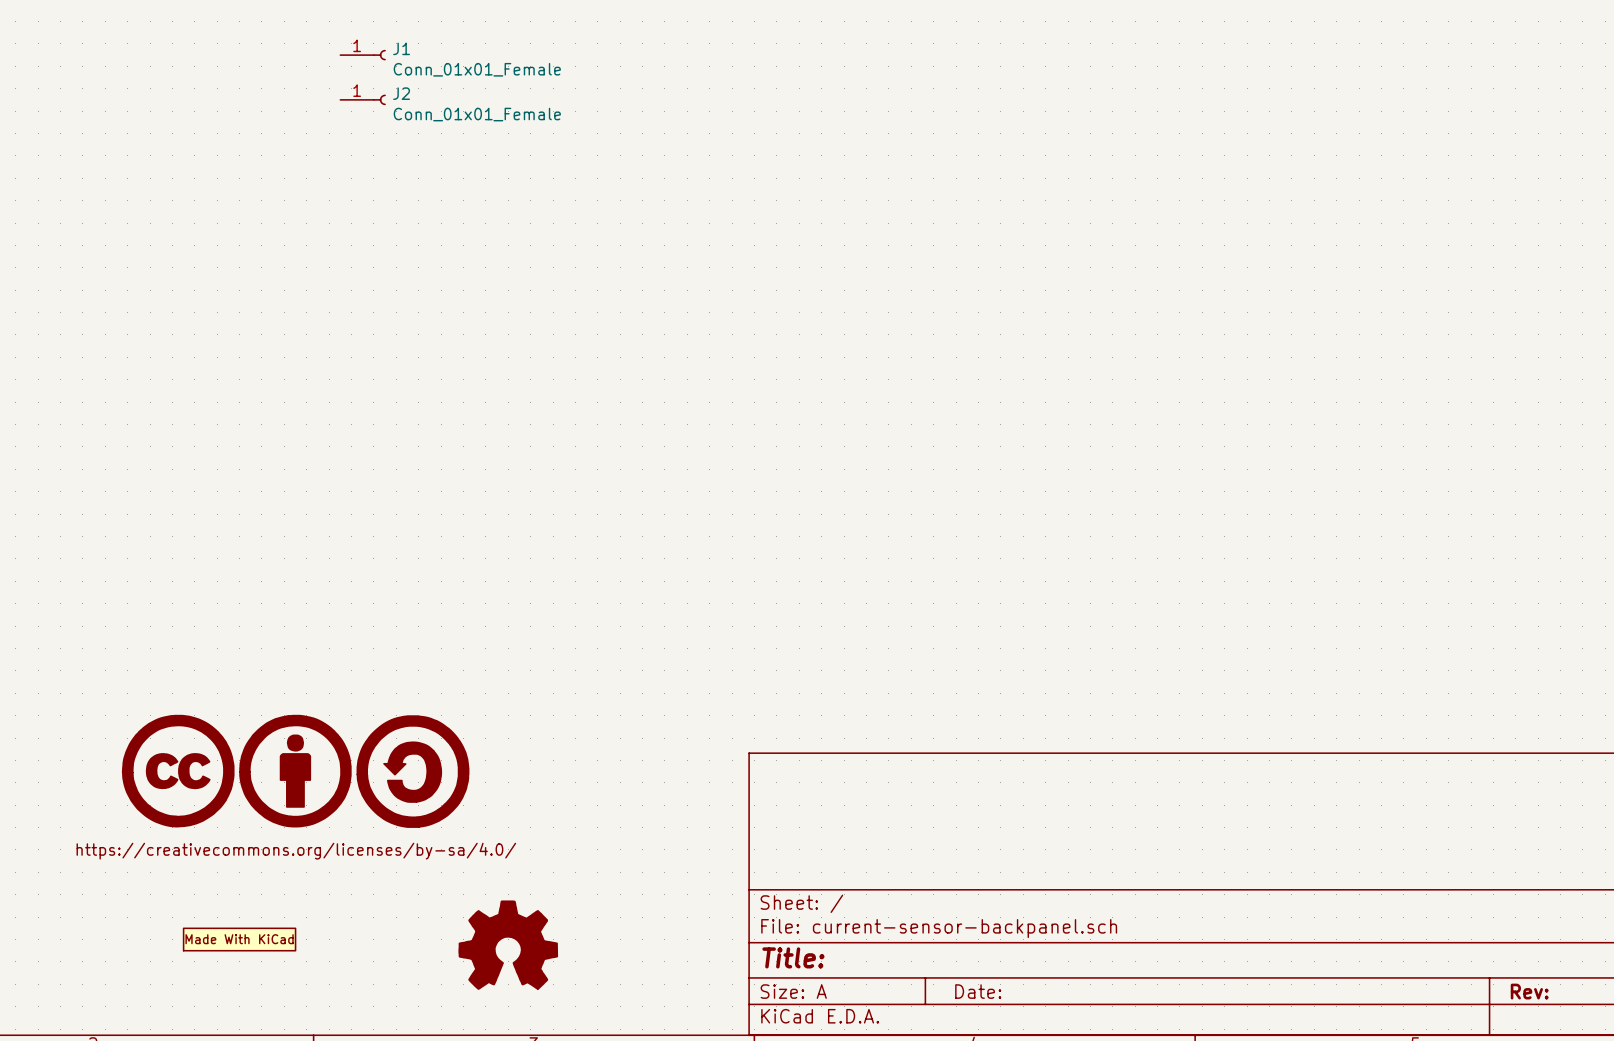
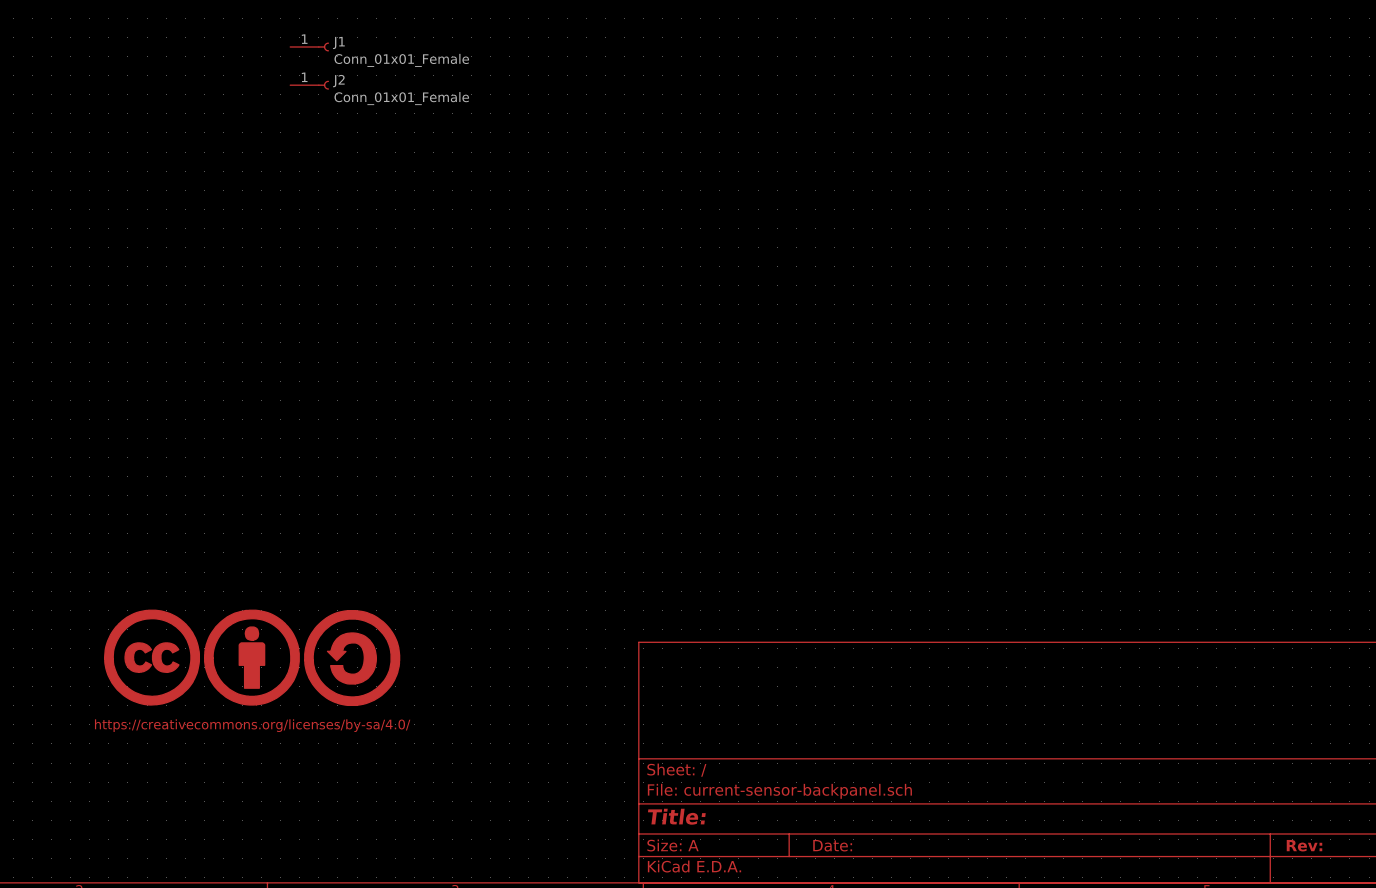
part: (239, 939) -> none
part: (508, 945) -> none

